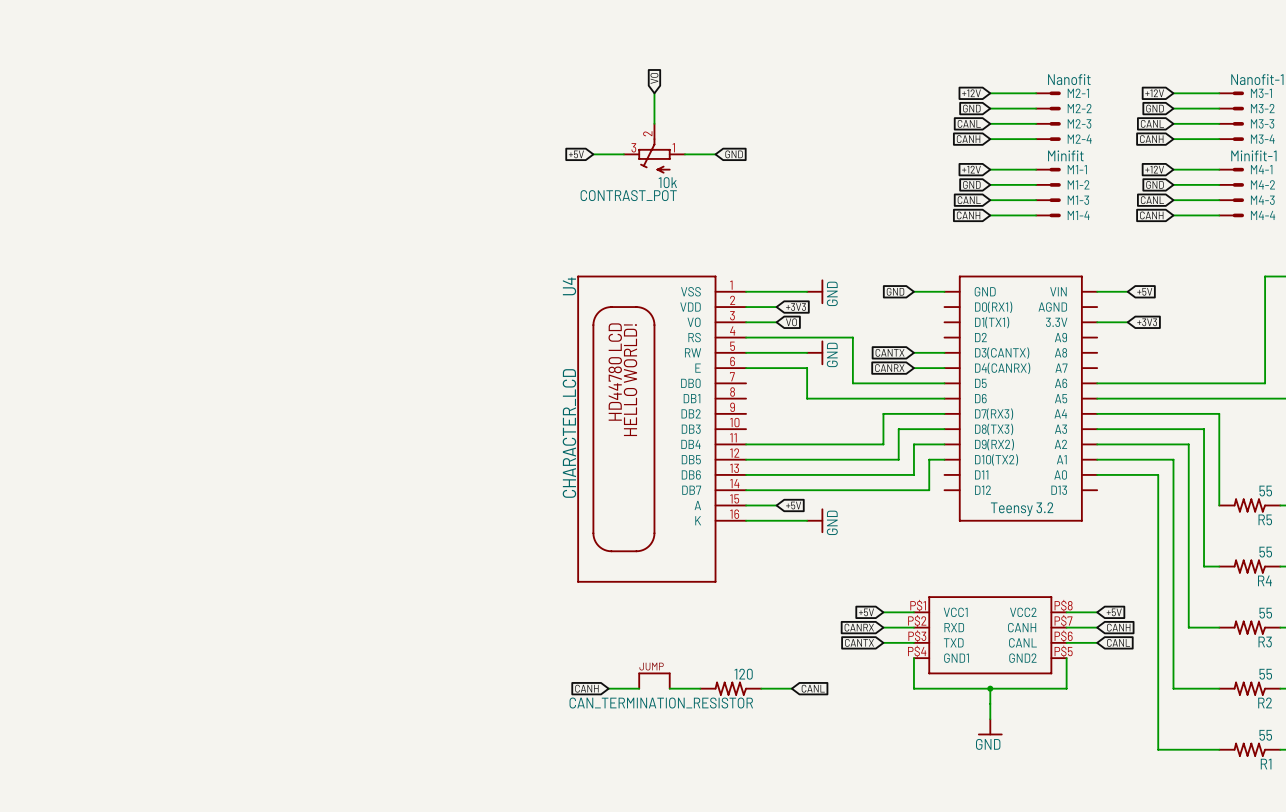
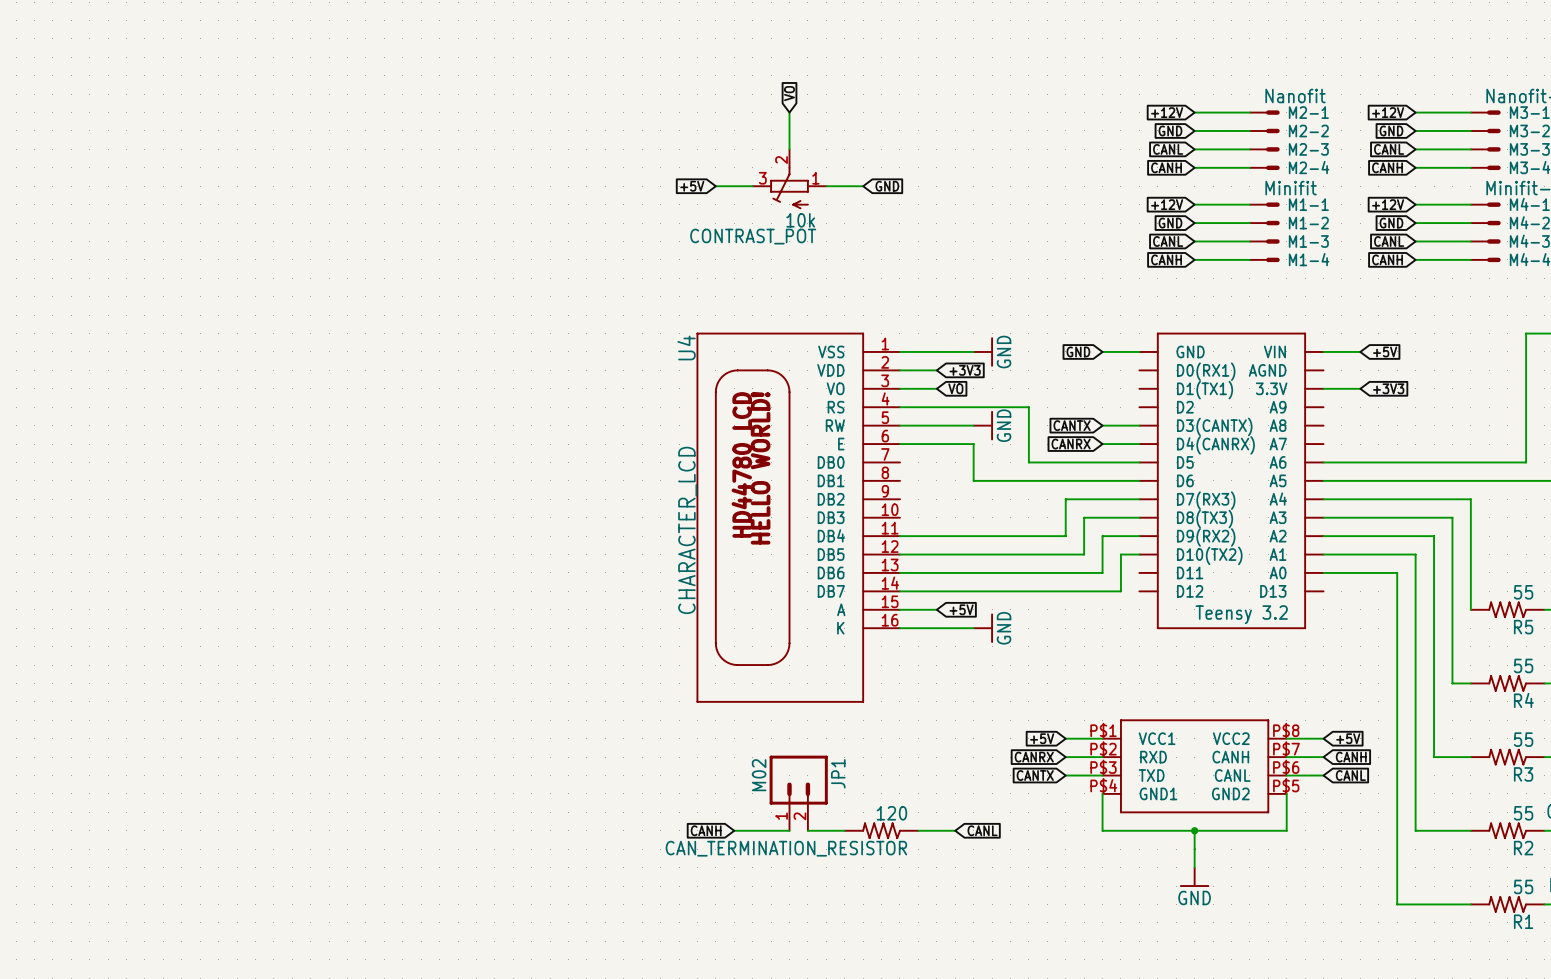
JP1: none -> M02 (798, 793)
part: (654, 680) -> none
wire: none -> (771, 830) (789, 830)

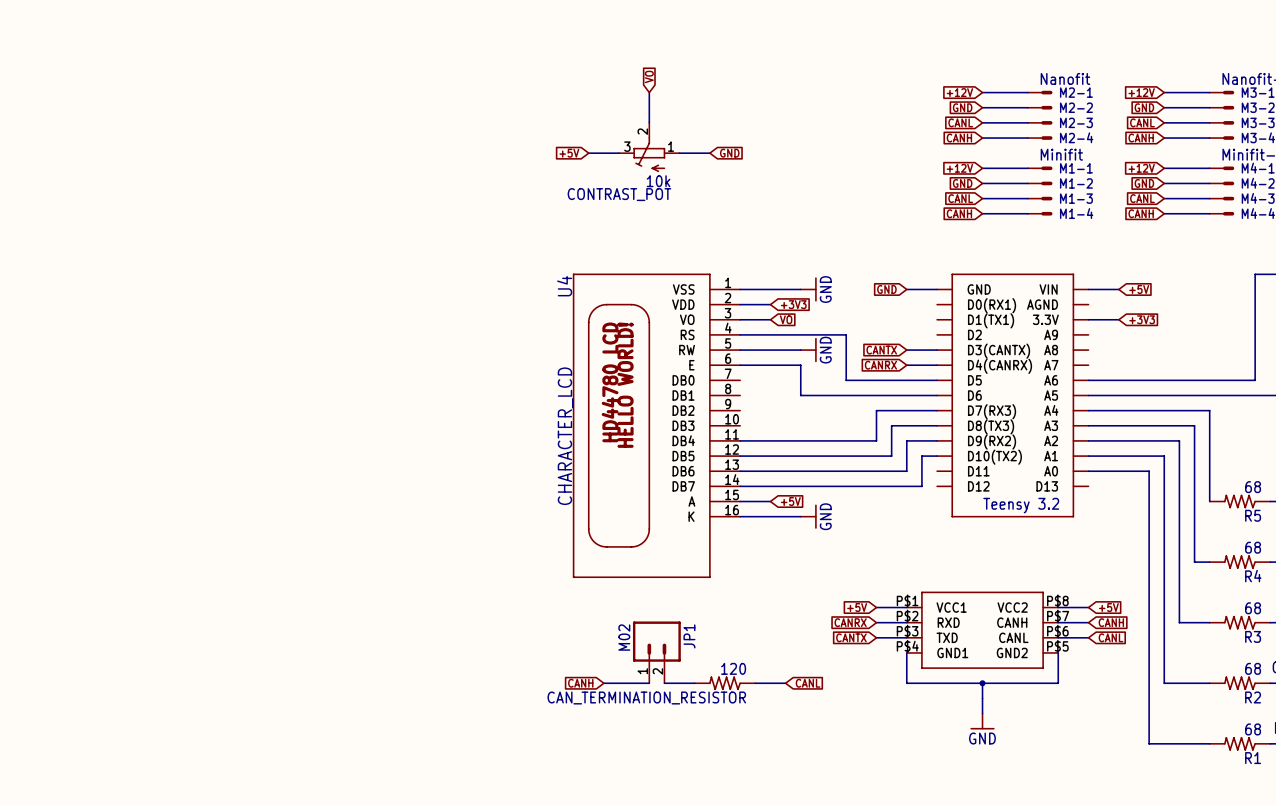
R5 value: 55 (1523, 592) -> 68 (1253, 487)
R4 value: 55 (1523, 665) -> 68 (1253, 547)
R3 value: 55 (1523, 739) -> 68 (1253, 608)
R2 value: 55 (1523, 813) -> 68 (1253, 668)
R1 value: 55 (1523, 886) -> 68 (1253, 729)

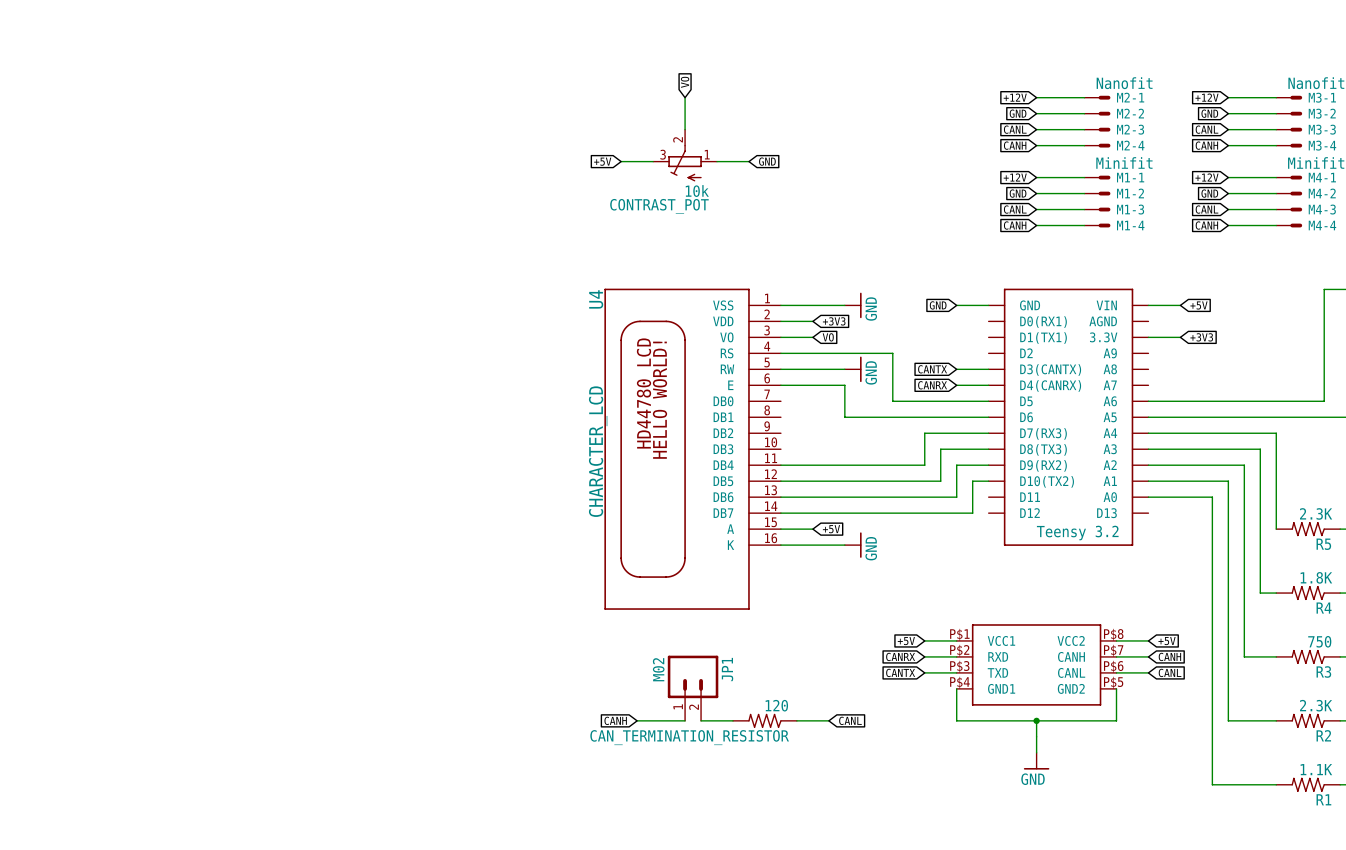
R5 value: 68 (1253, 487) -> 2.3K (1316, 513)
R4 value: 68 (1253, 547) -> 1.8K (1316, 577)
R3 value: 68 (1253, 608) -> 750 (1319, 641)
R2 value: 68 (1253, 668) -> 2.3K (1316, 705)
R1 value: 68 (1253, 729) -> 1.1K (1316, 769)

